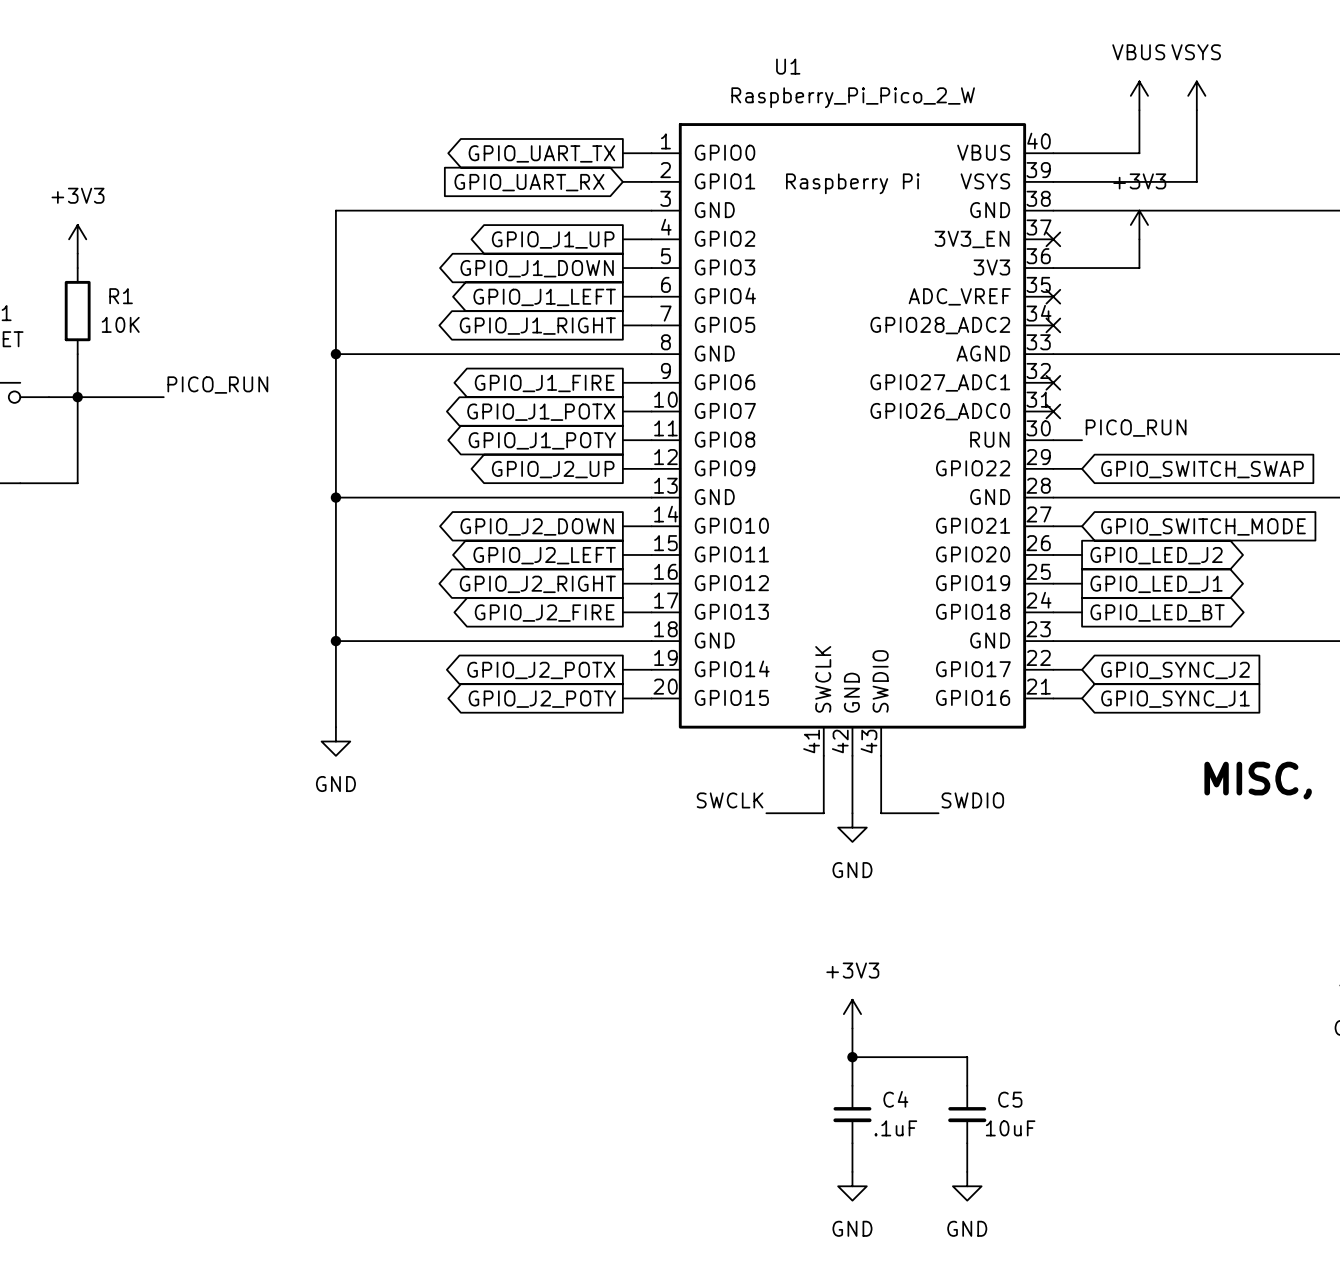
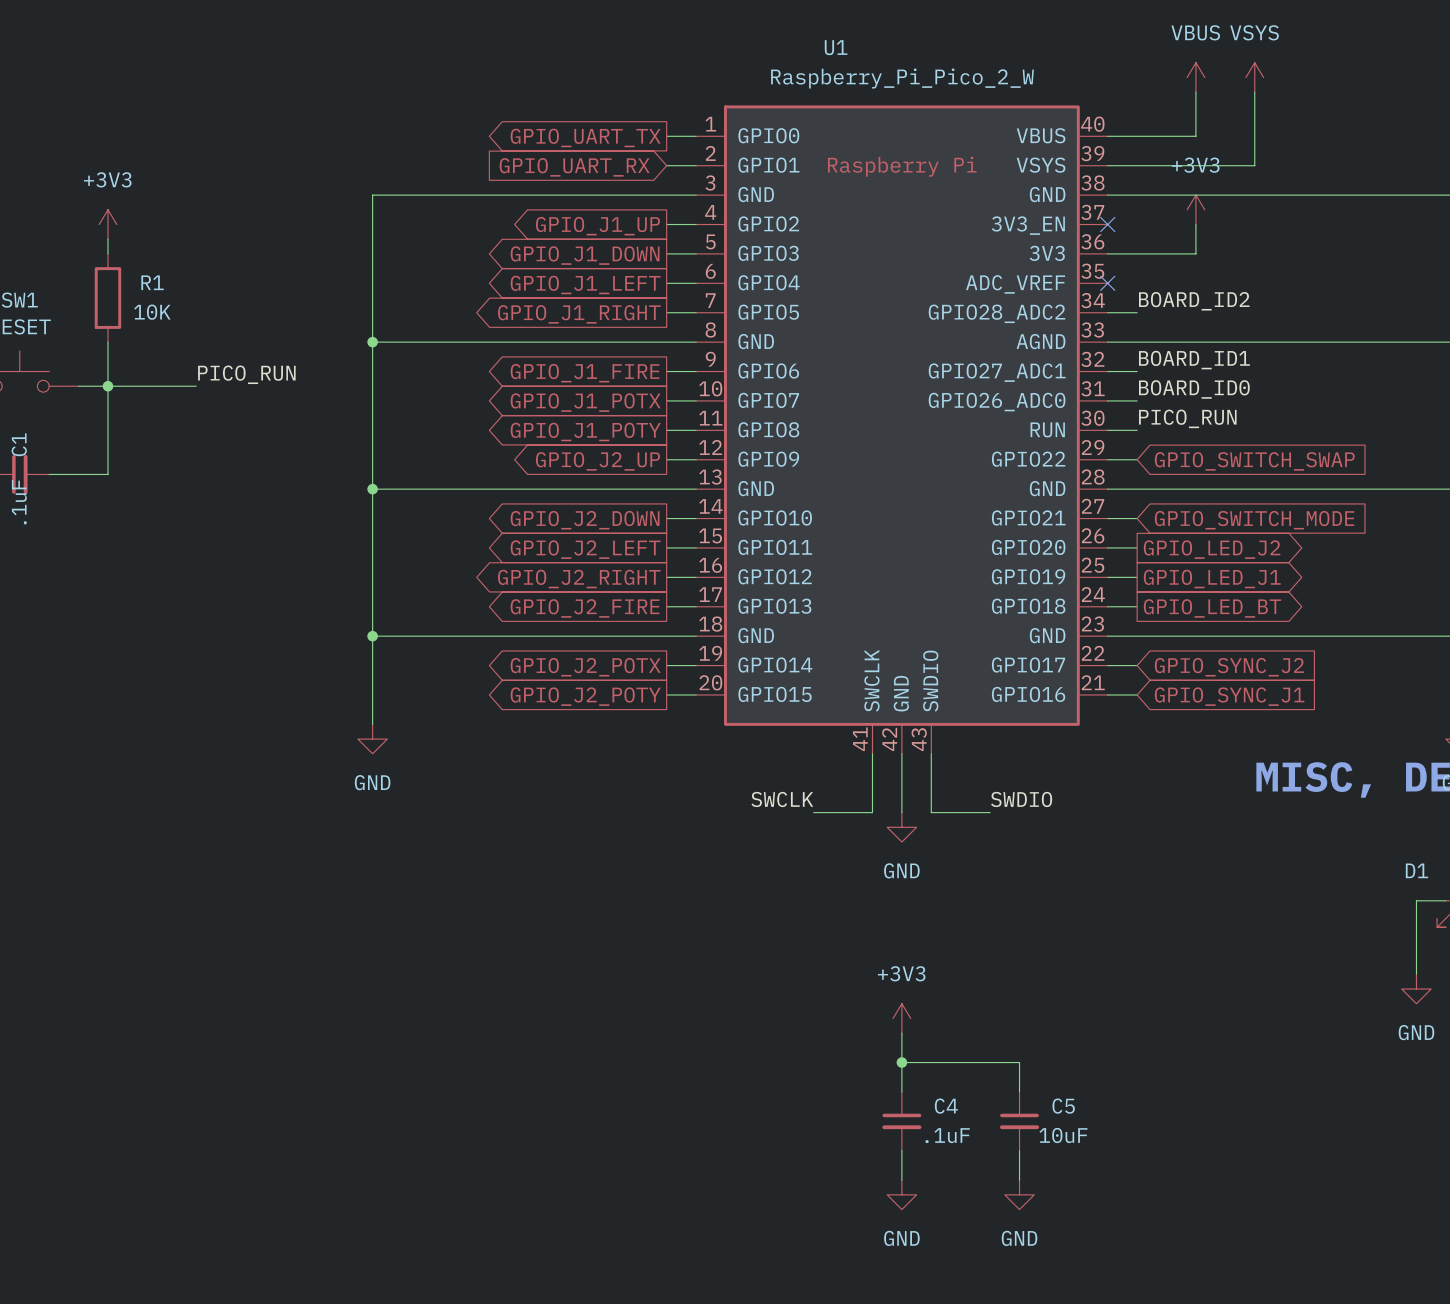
label: none -> BOARD_ID2 (1194, 301)
wire: none -> (1107, 312) (1137, 312)
no-connect mark: (1053, 325) -> none
label: none -> BOARD_ID1 (1194, 360)
wire: none -> (1107, 371) (1137, 371)
no-connect mark: (1053, 382) -> none
label: none -> BOARD_ID0 (1194, 389)
wire: none -> (1107, 400) (1137, 400)
no-connect mark: (1053, 411) -> none

